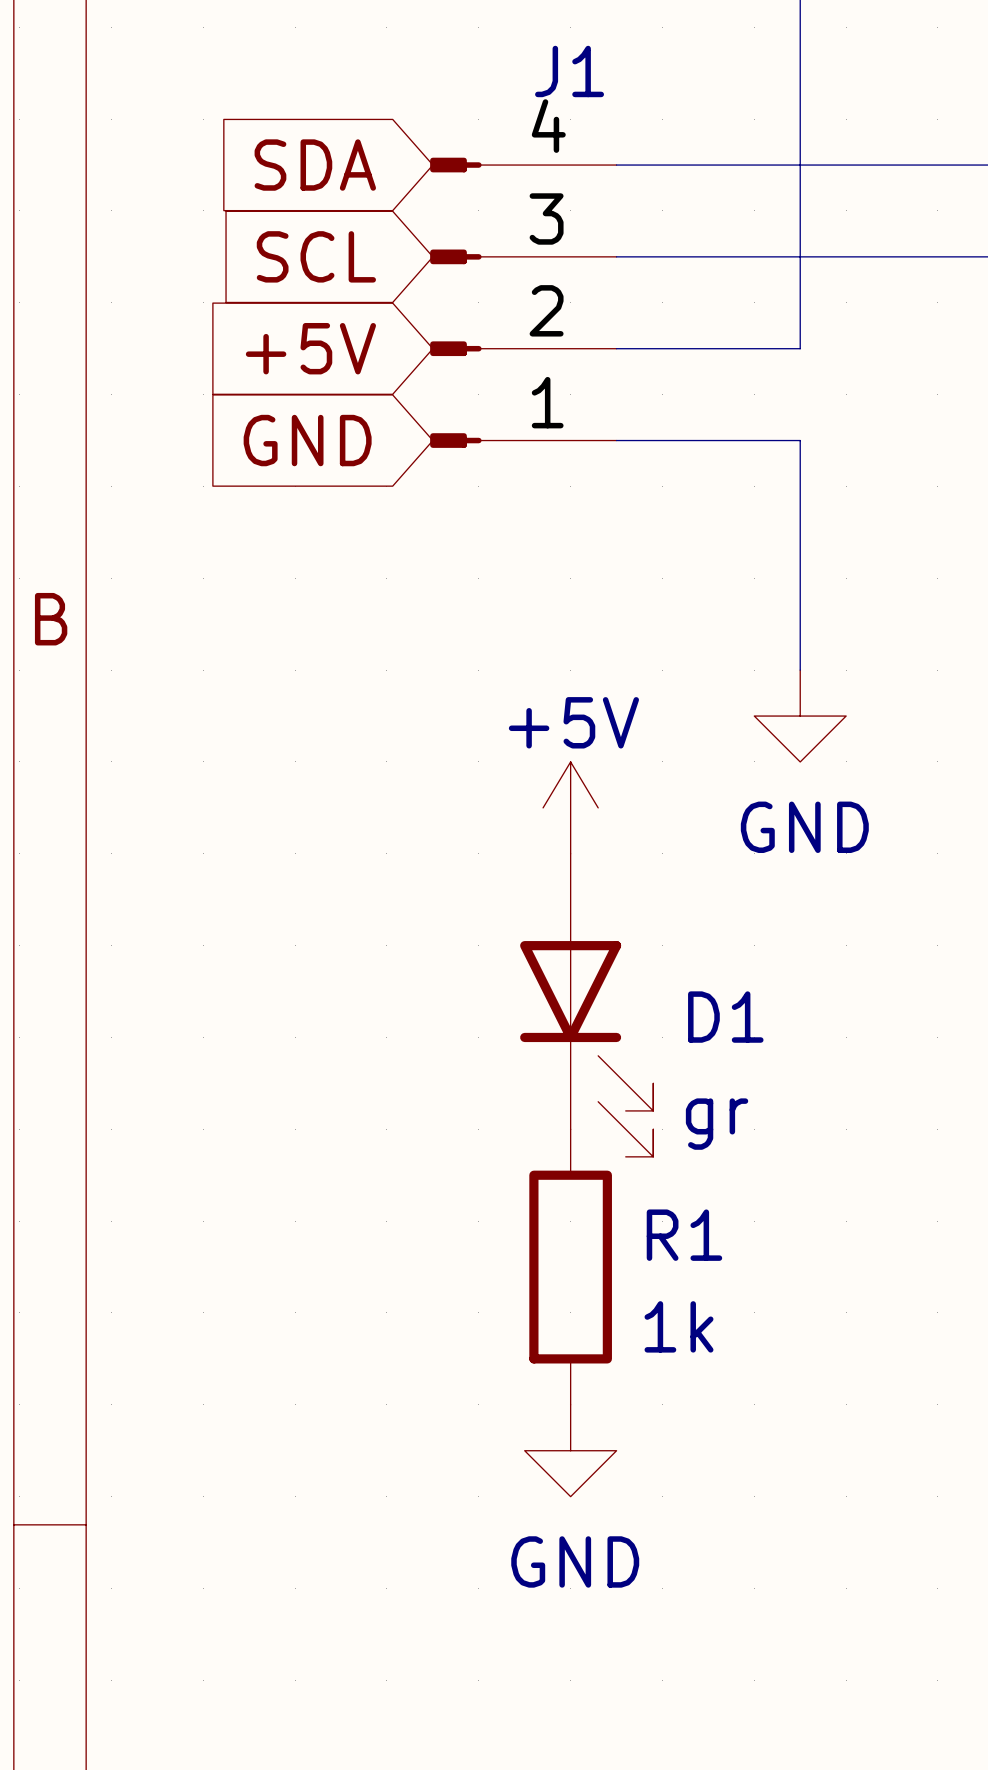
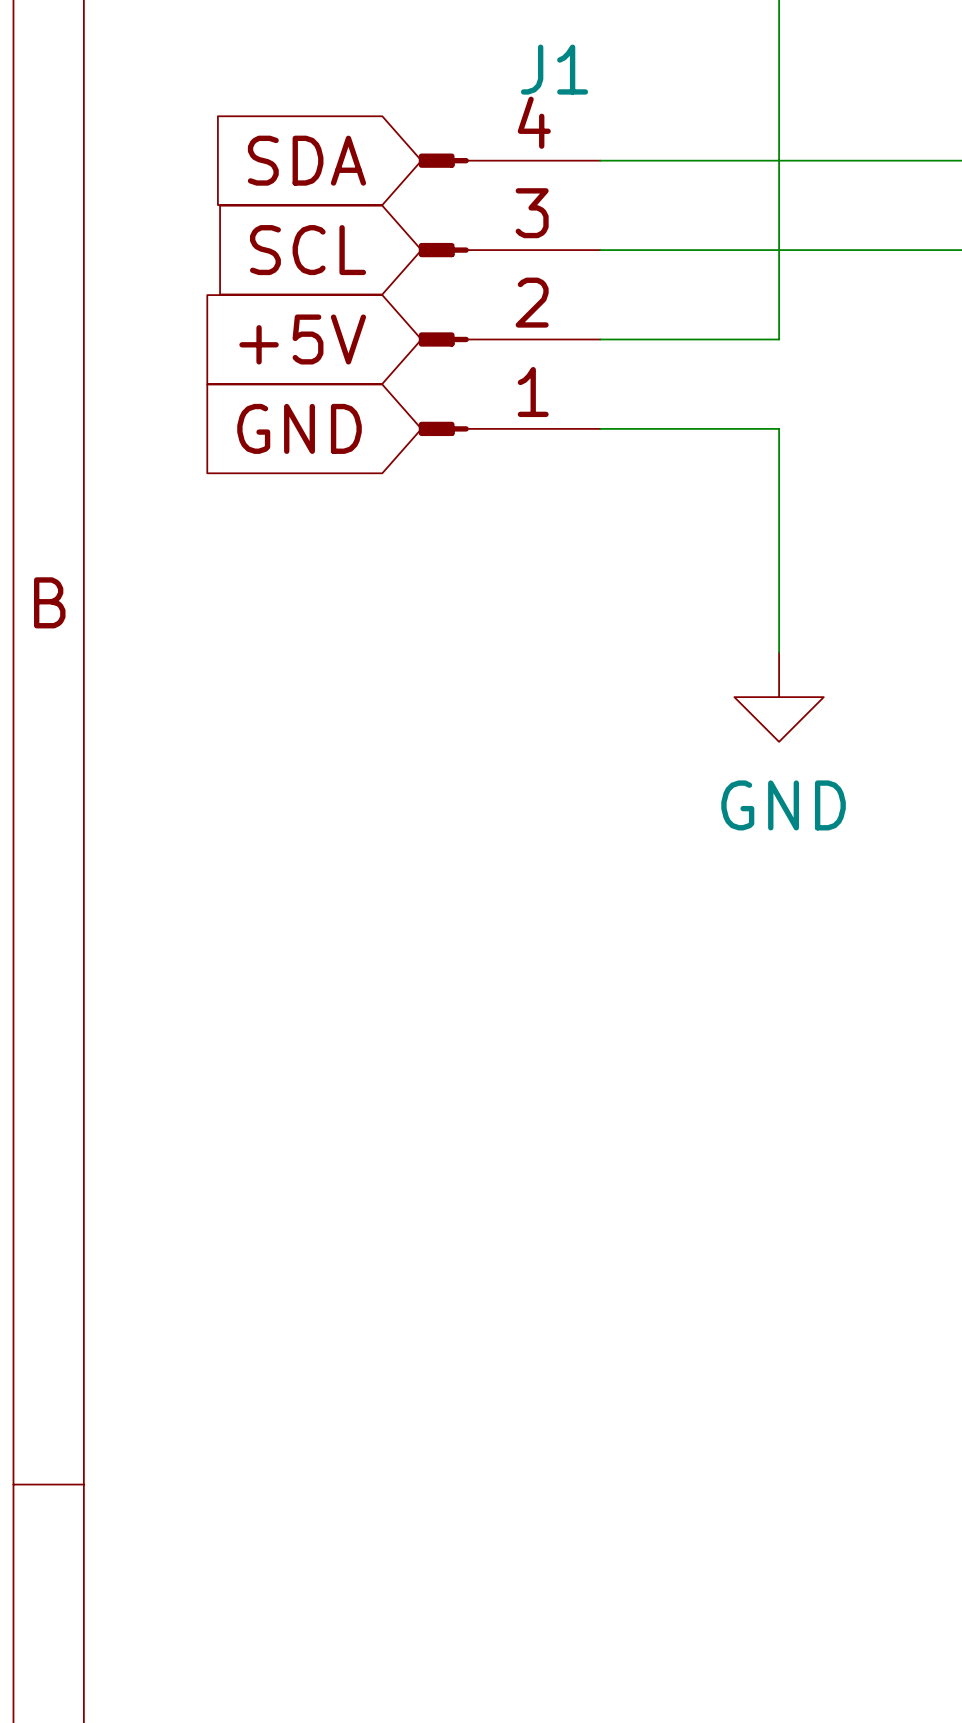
power symbol: +5V (570, 807) -> none
D1: gr (586, 1005) -> none
R1: 1k (570, 1267) -> none
power symbol: GND (570, 1450) -> none

